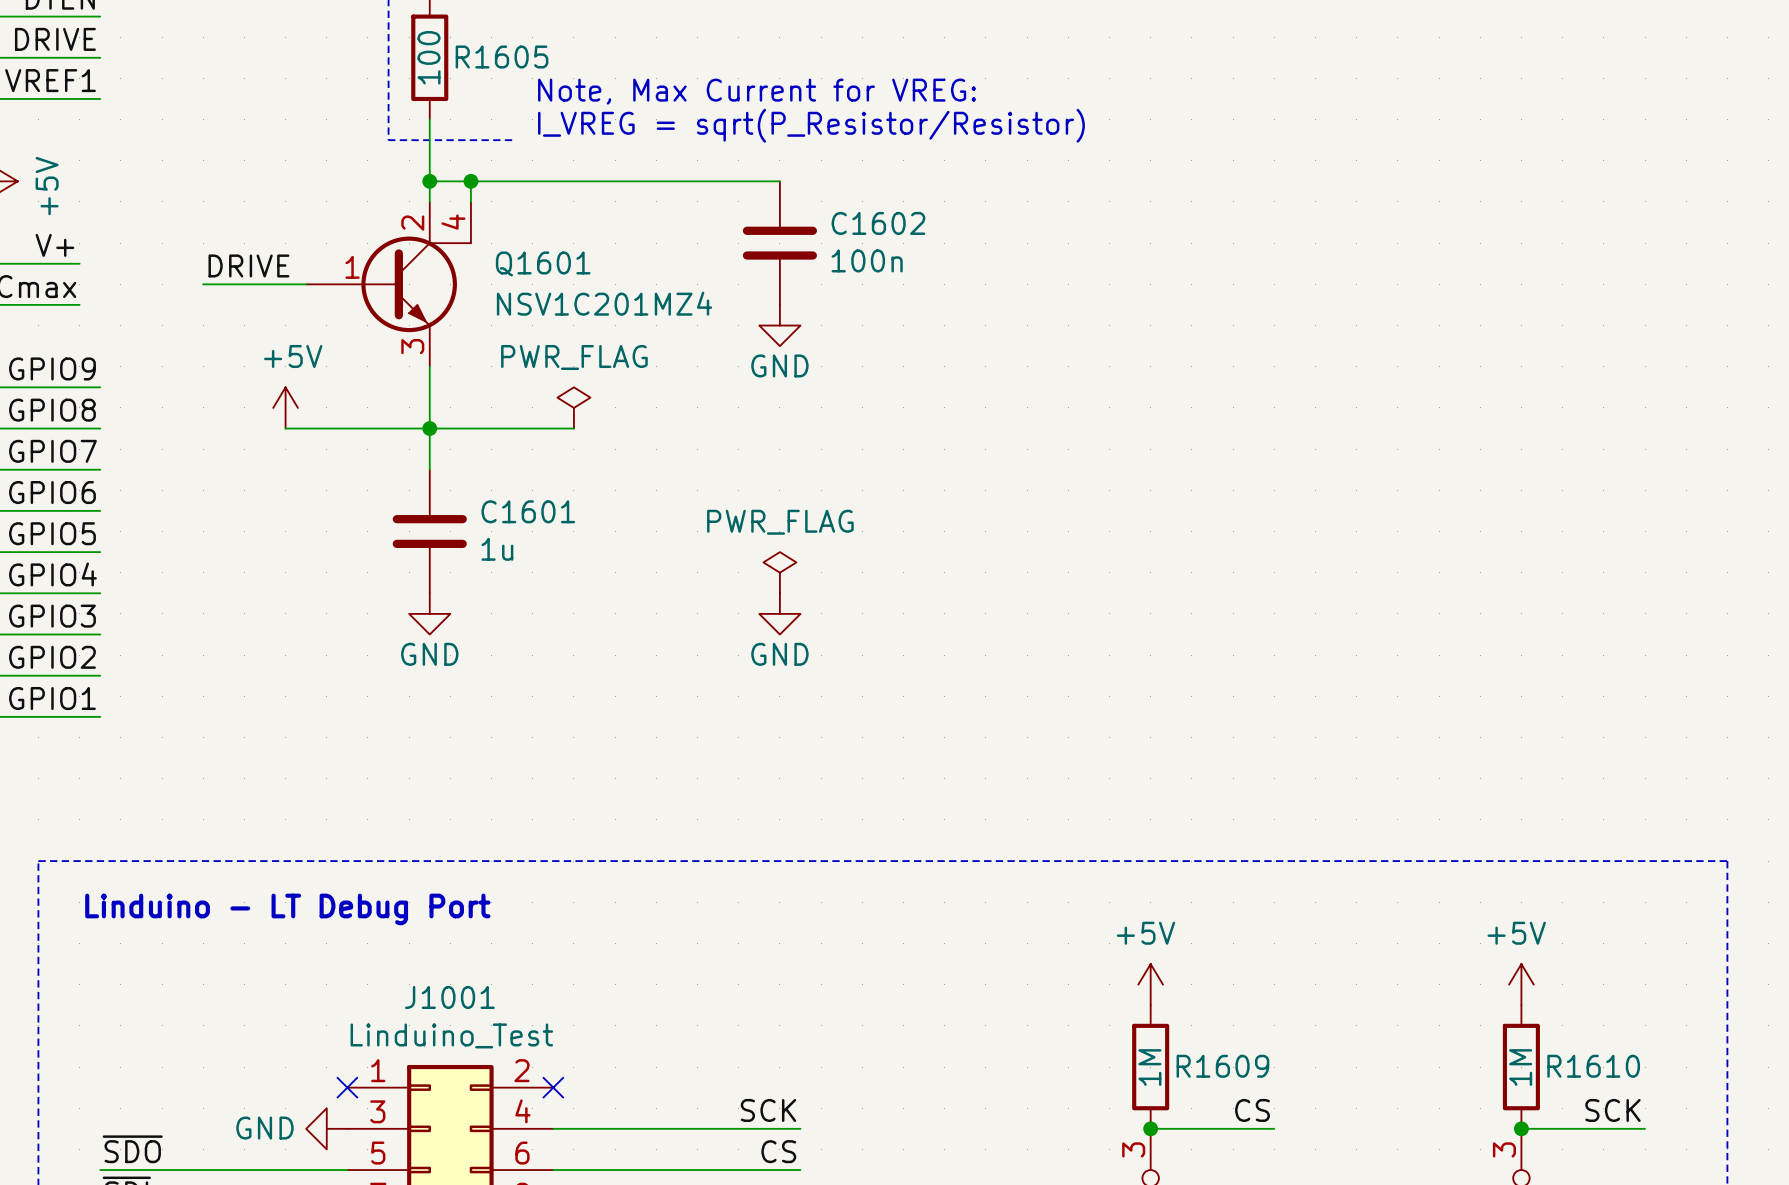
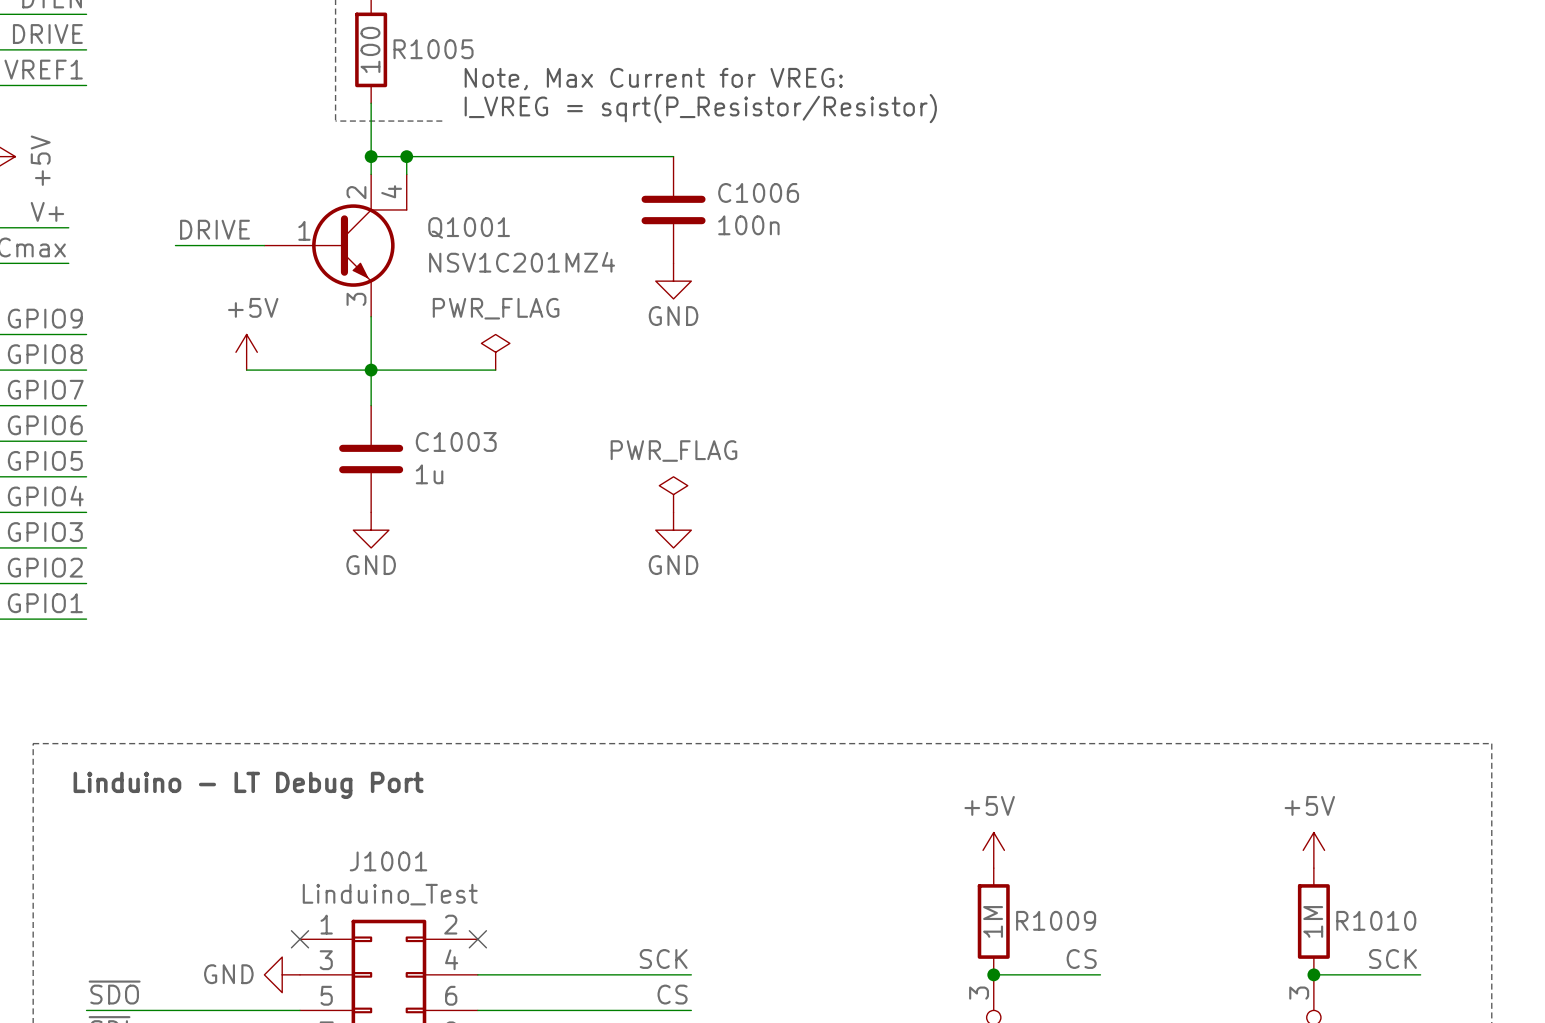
R1605 name: R1605 (502, 57) -> R1005 (433, 49)
C1602 name: C1602 (878, 223) -> C1006 (758, 192)
Q1601 name: Q1601 (543, 263) -> Q1001 (469, 227)
C1601 name: C1601 (528, 511) -> C1003 (456, 441)
R1609 name: R1609 (1222, 1066) -> R1009 (1056, 920)
R1610 name: R1610 (1593, 1066) -> R1010 (1376, 920)

